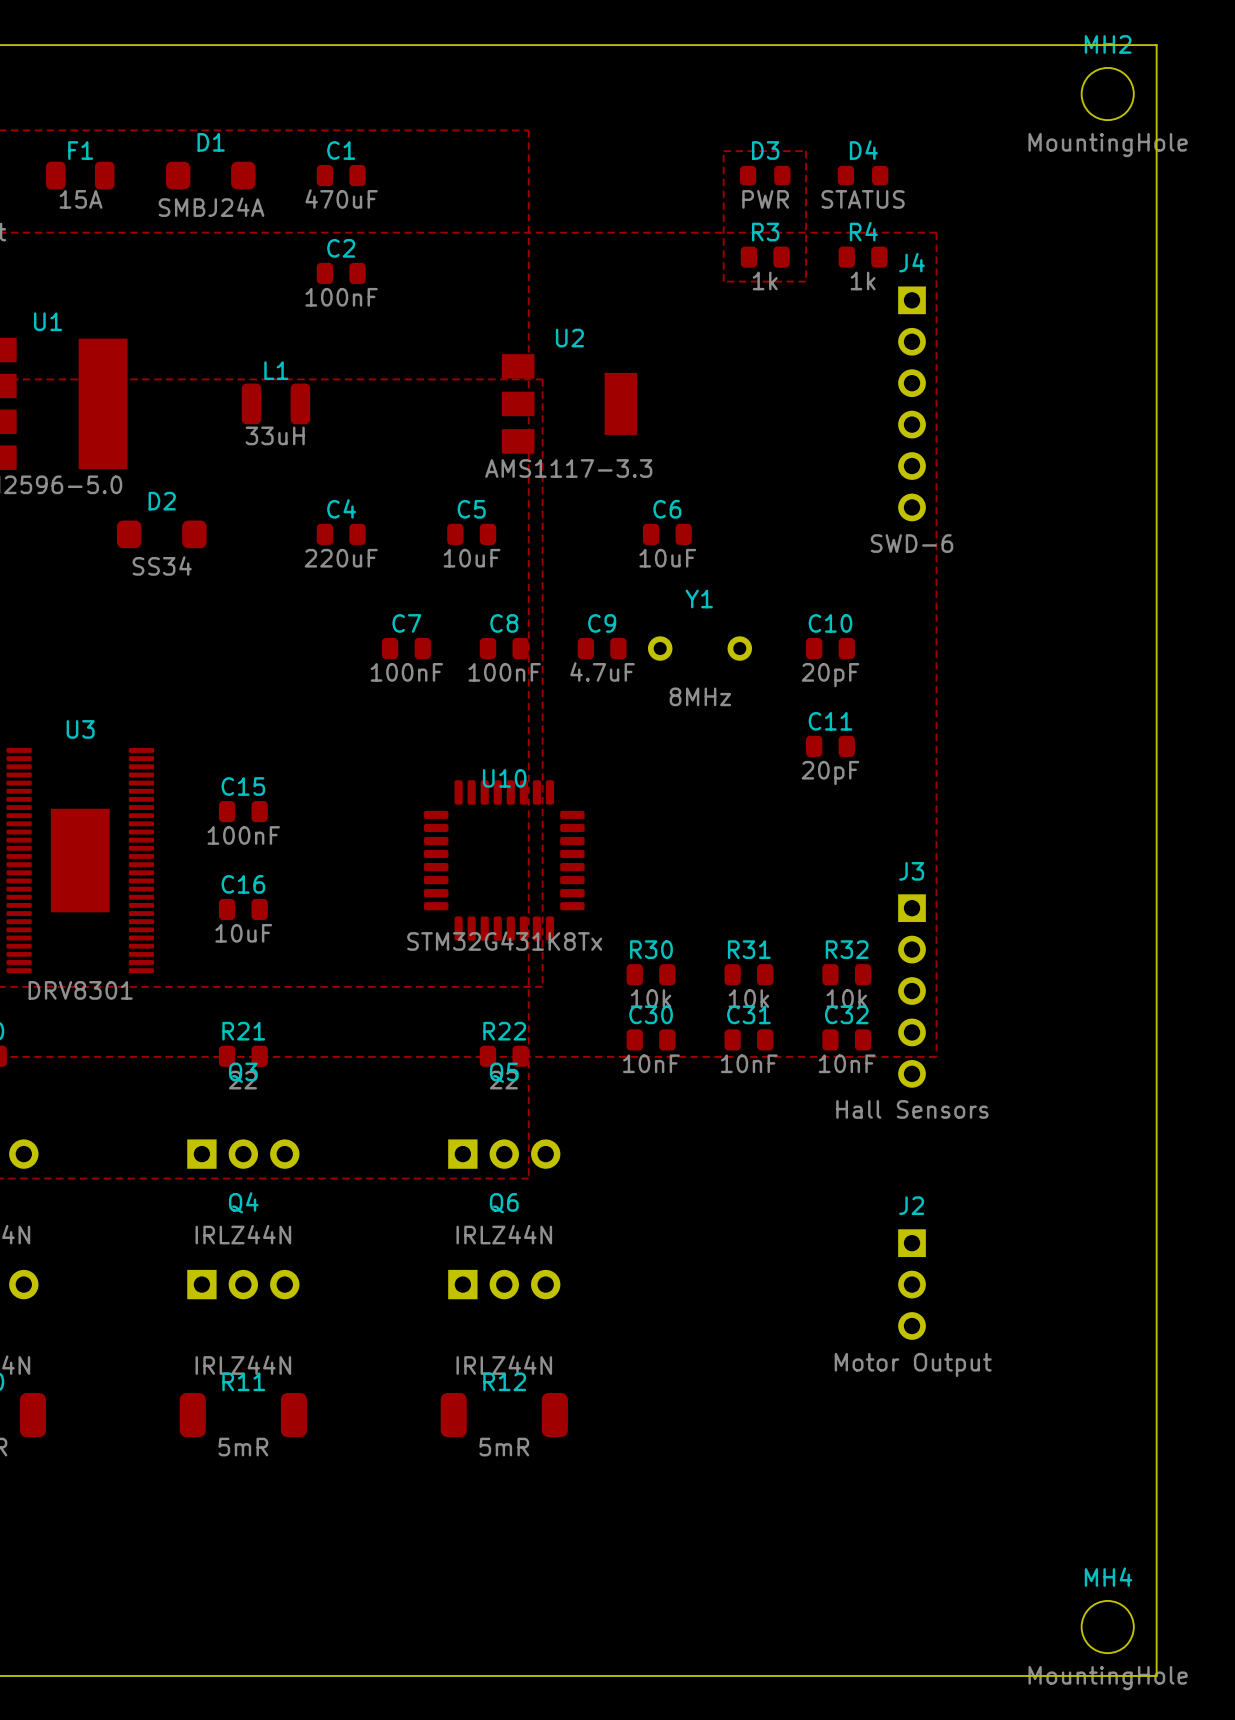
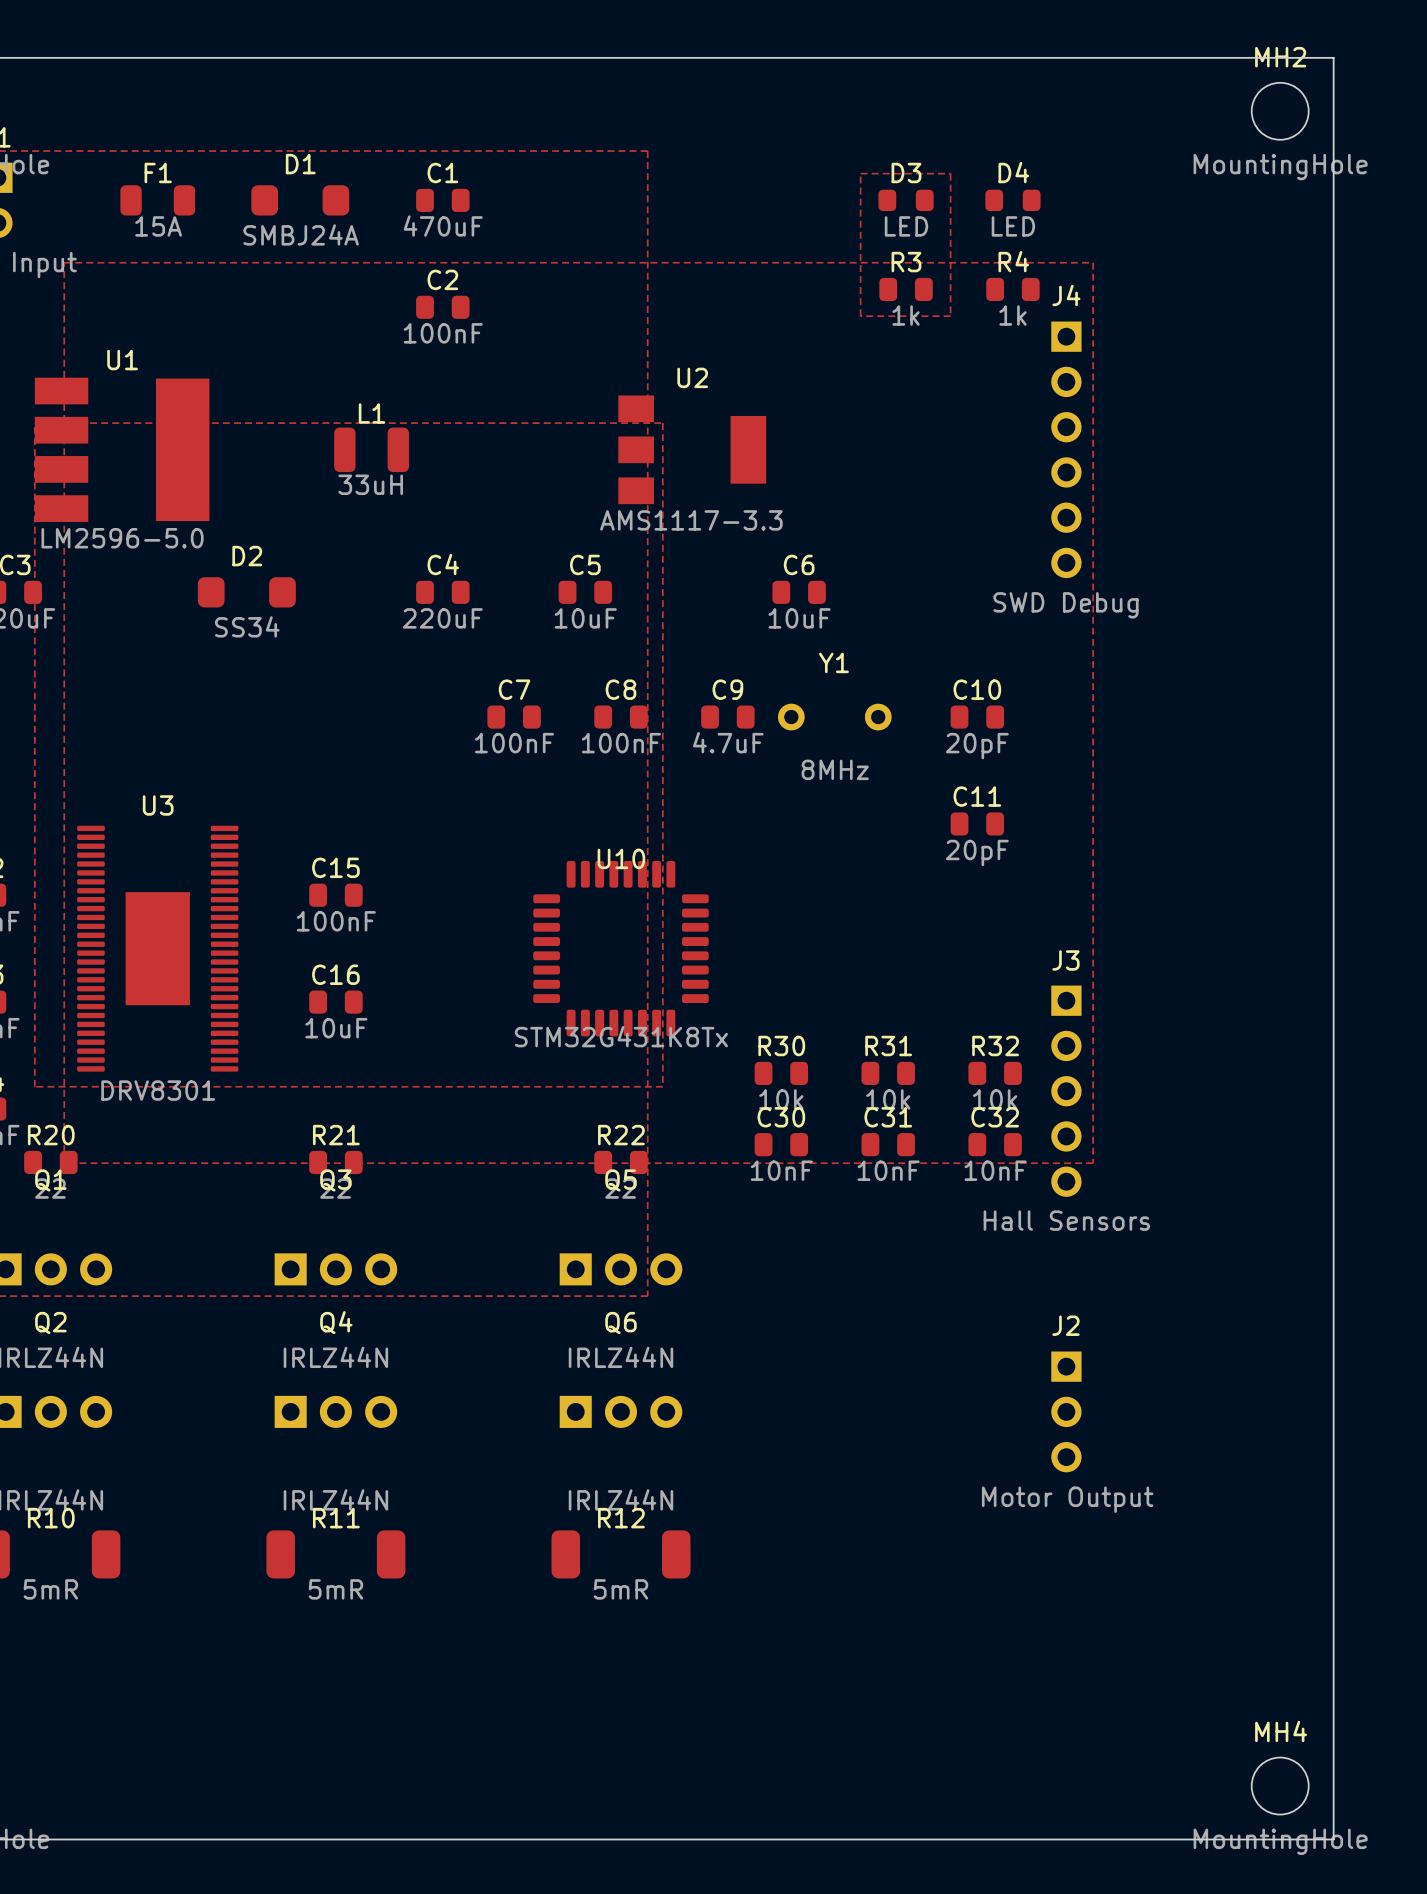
D3 value: PWR (765, 199) -> LED (906, 226)
D4 value: STATUS (863, 199) -> LED (1013, 226)
J4 value: SWD-6 (912, 543) -> SWD Debug (1065, 605)

